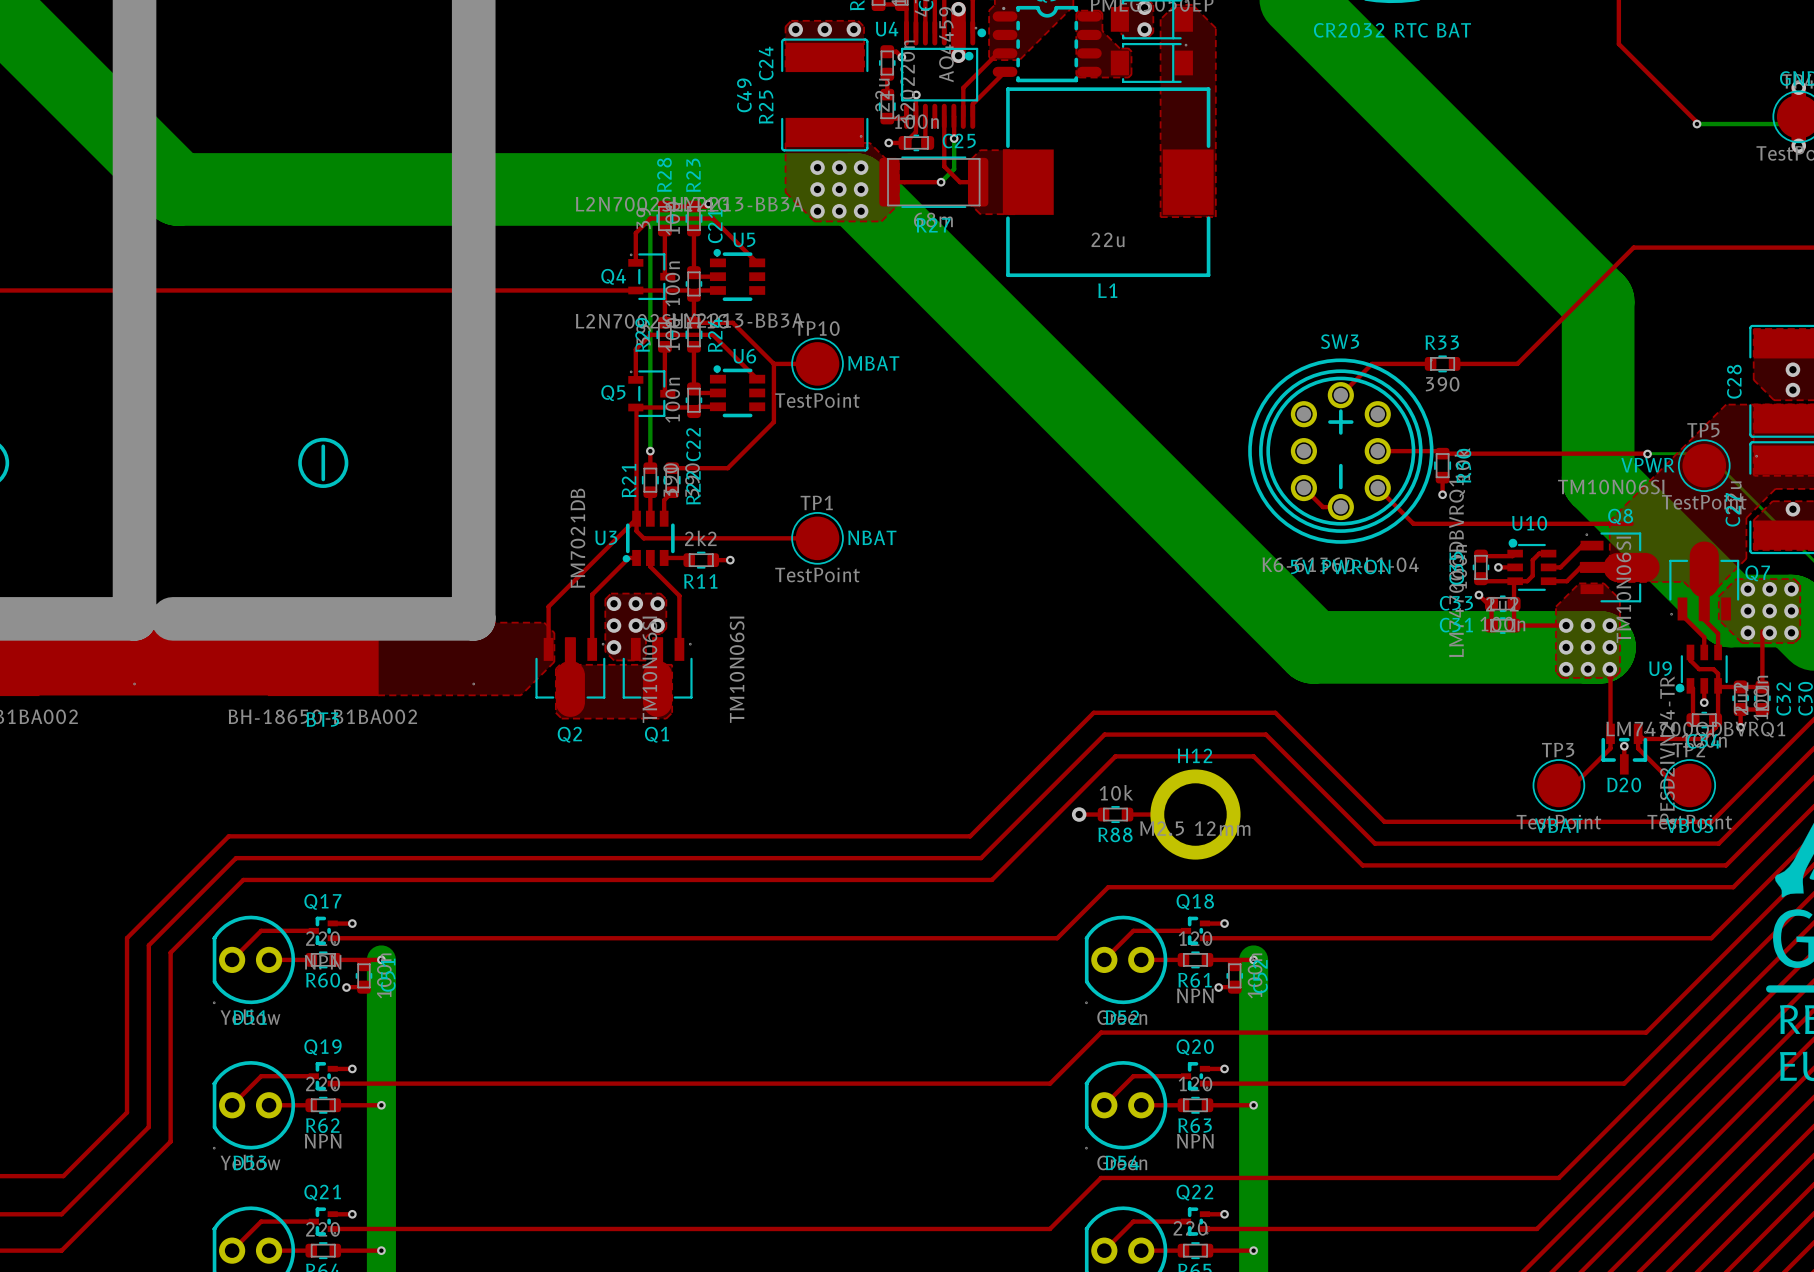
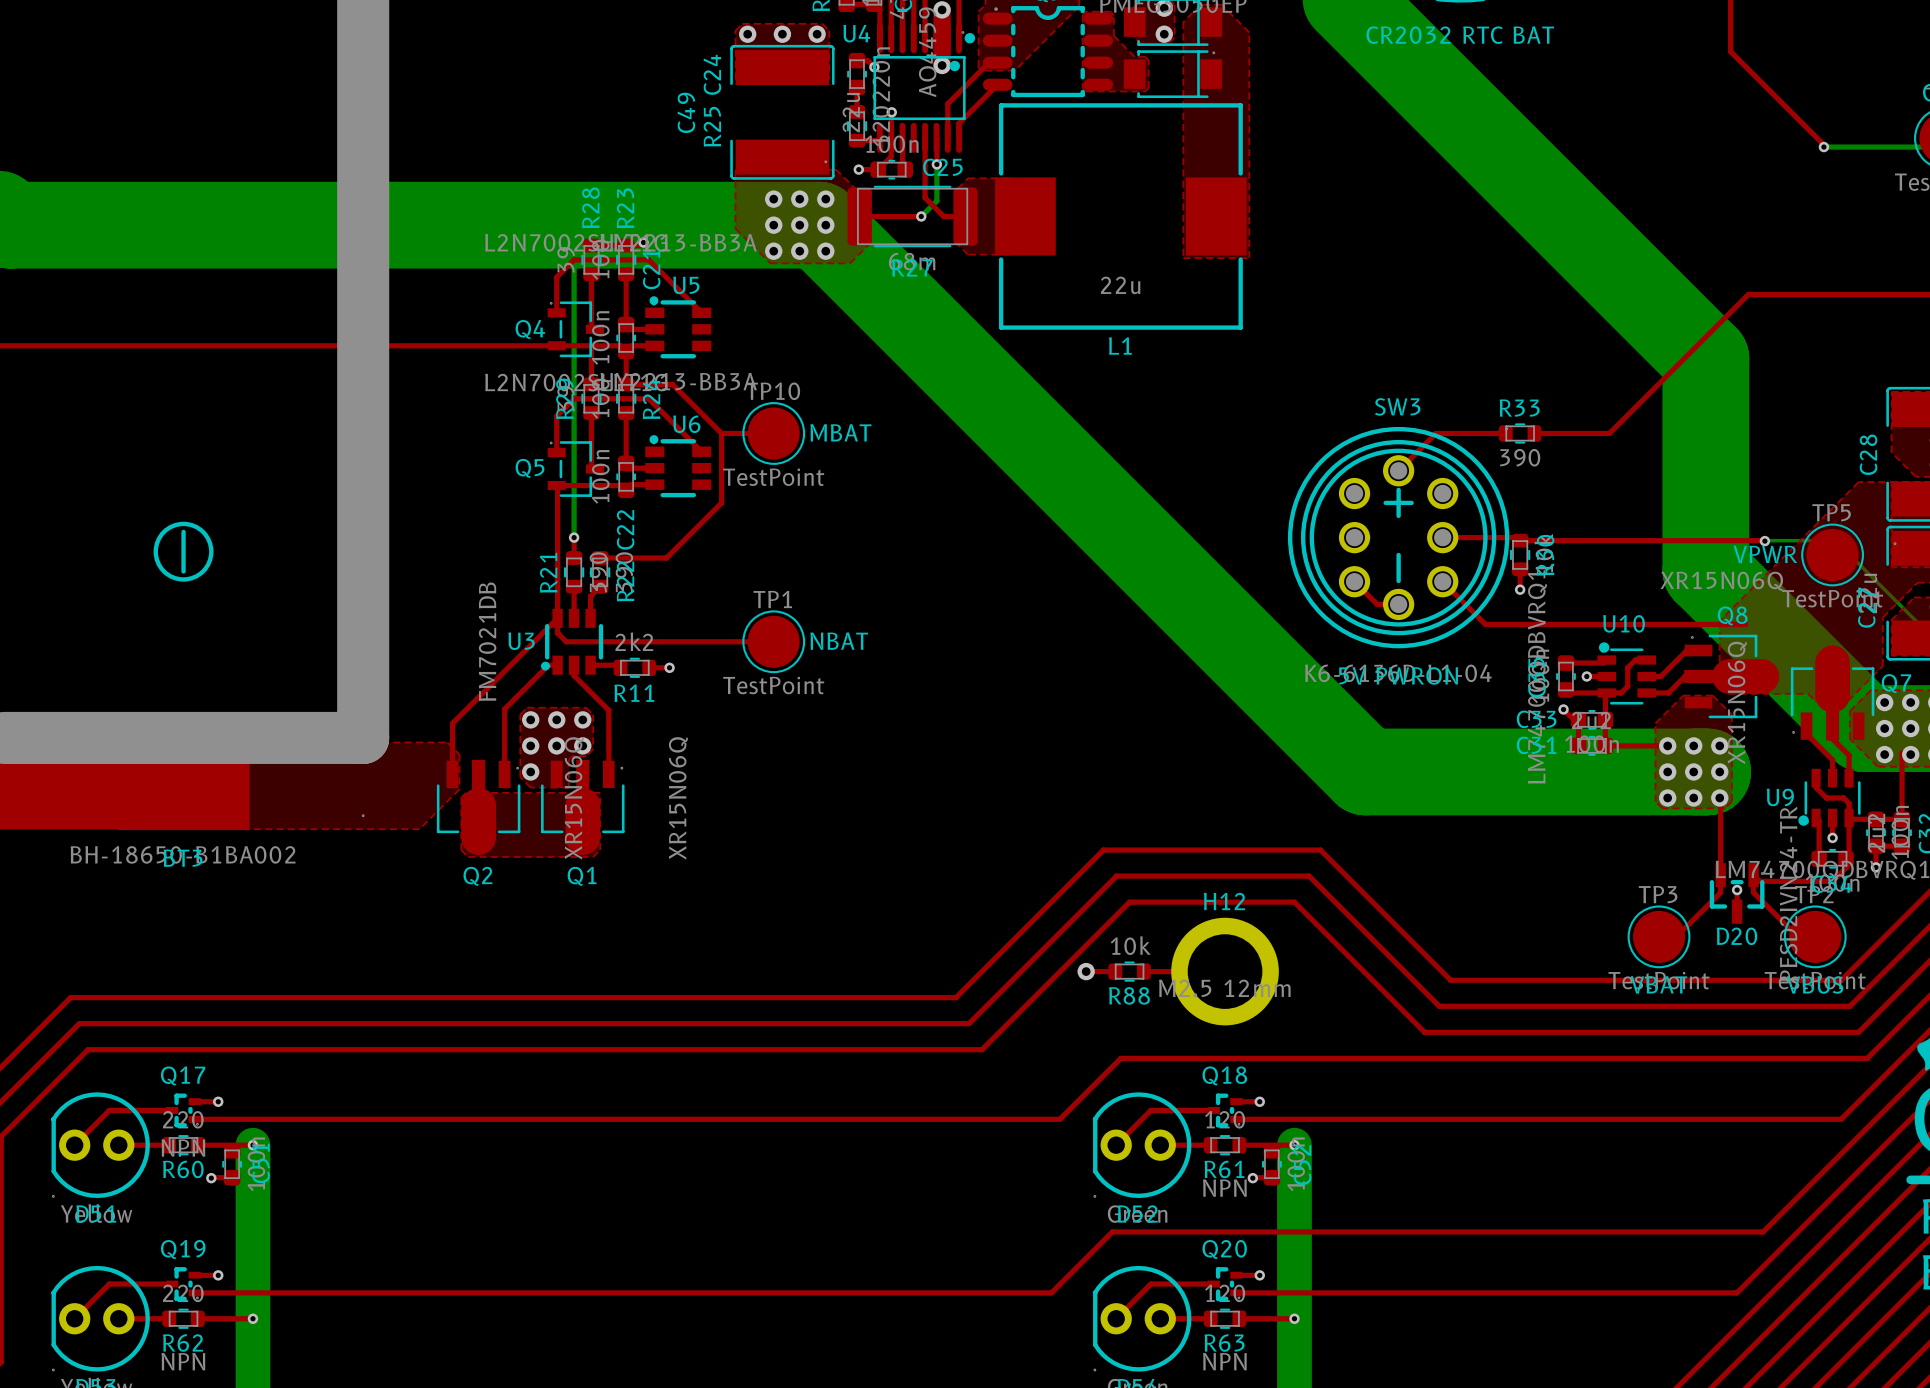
Q8 value: TM10N06SI (1611, 487) -> XR15N06Q (1721, 581)
Q7 value: TM10N06SI (1623, 589) -> XR15N06Q (1737, 702)
Q2 value: TM10N06SI (649, 669) -> XR15N06Q (574, 798)
Q1 value: TM10N06SI (737, 669) -> XR15N06Q (678, 798)

